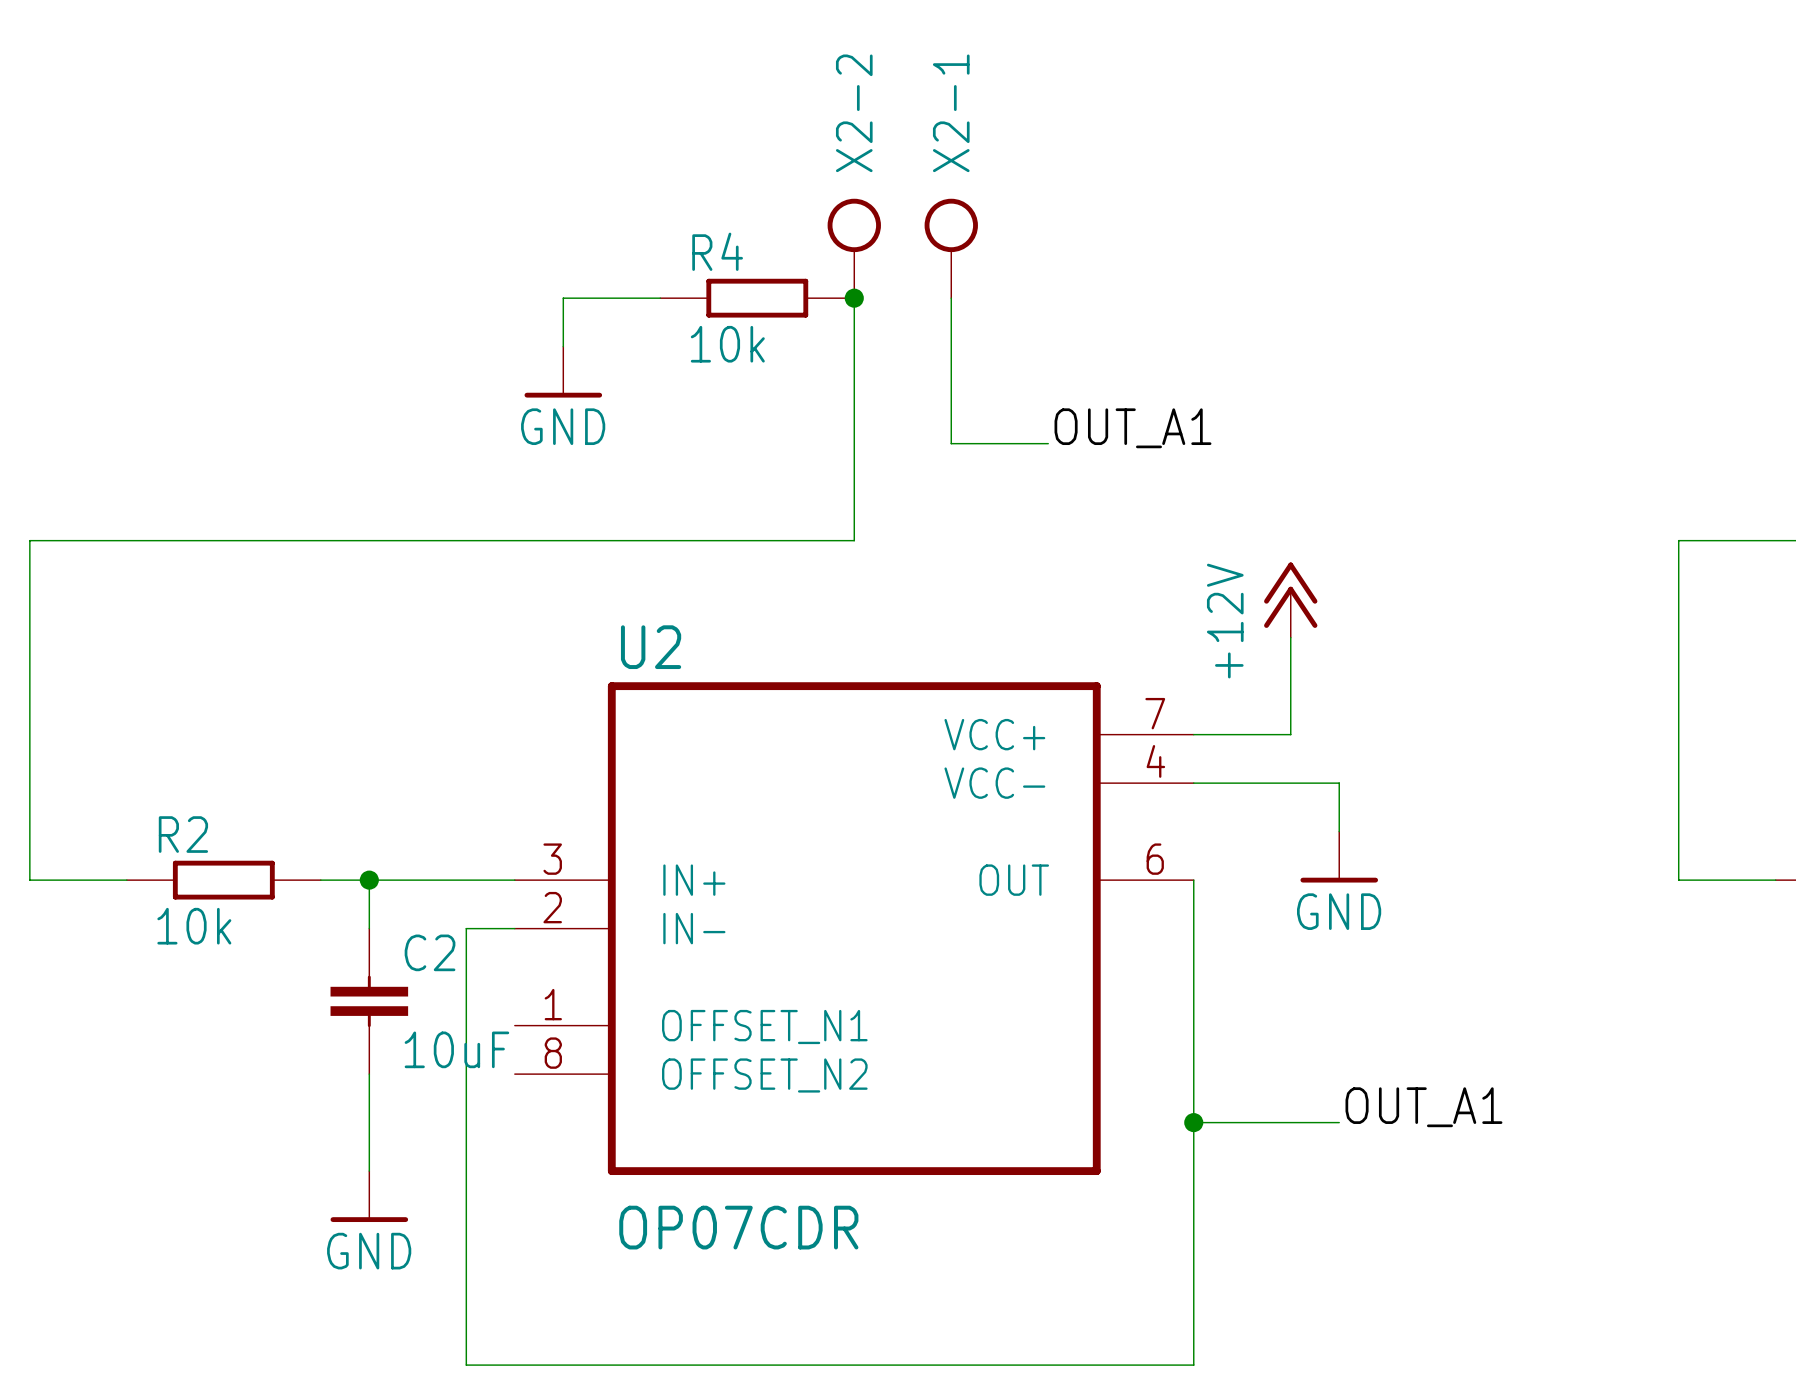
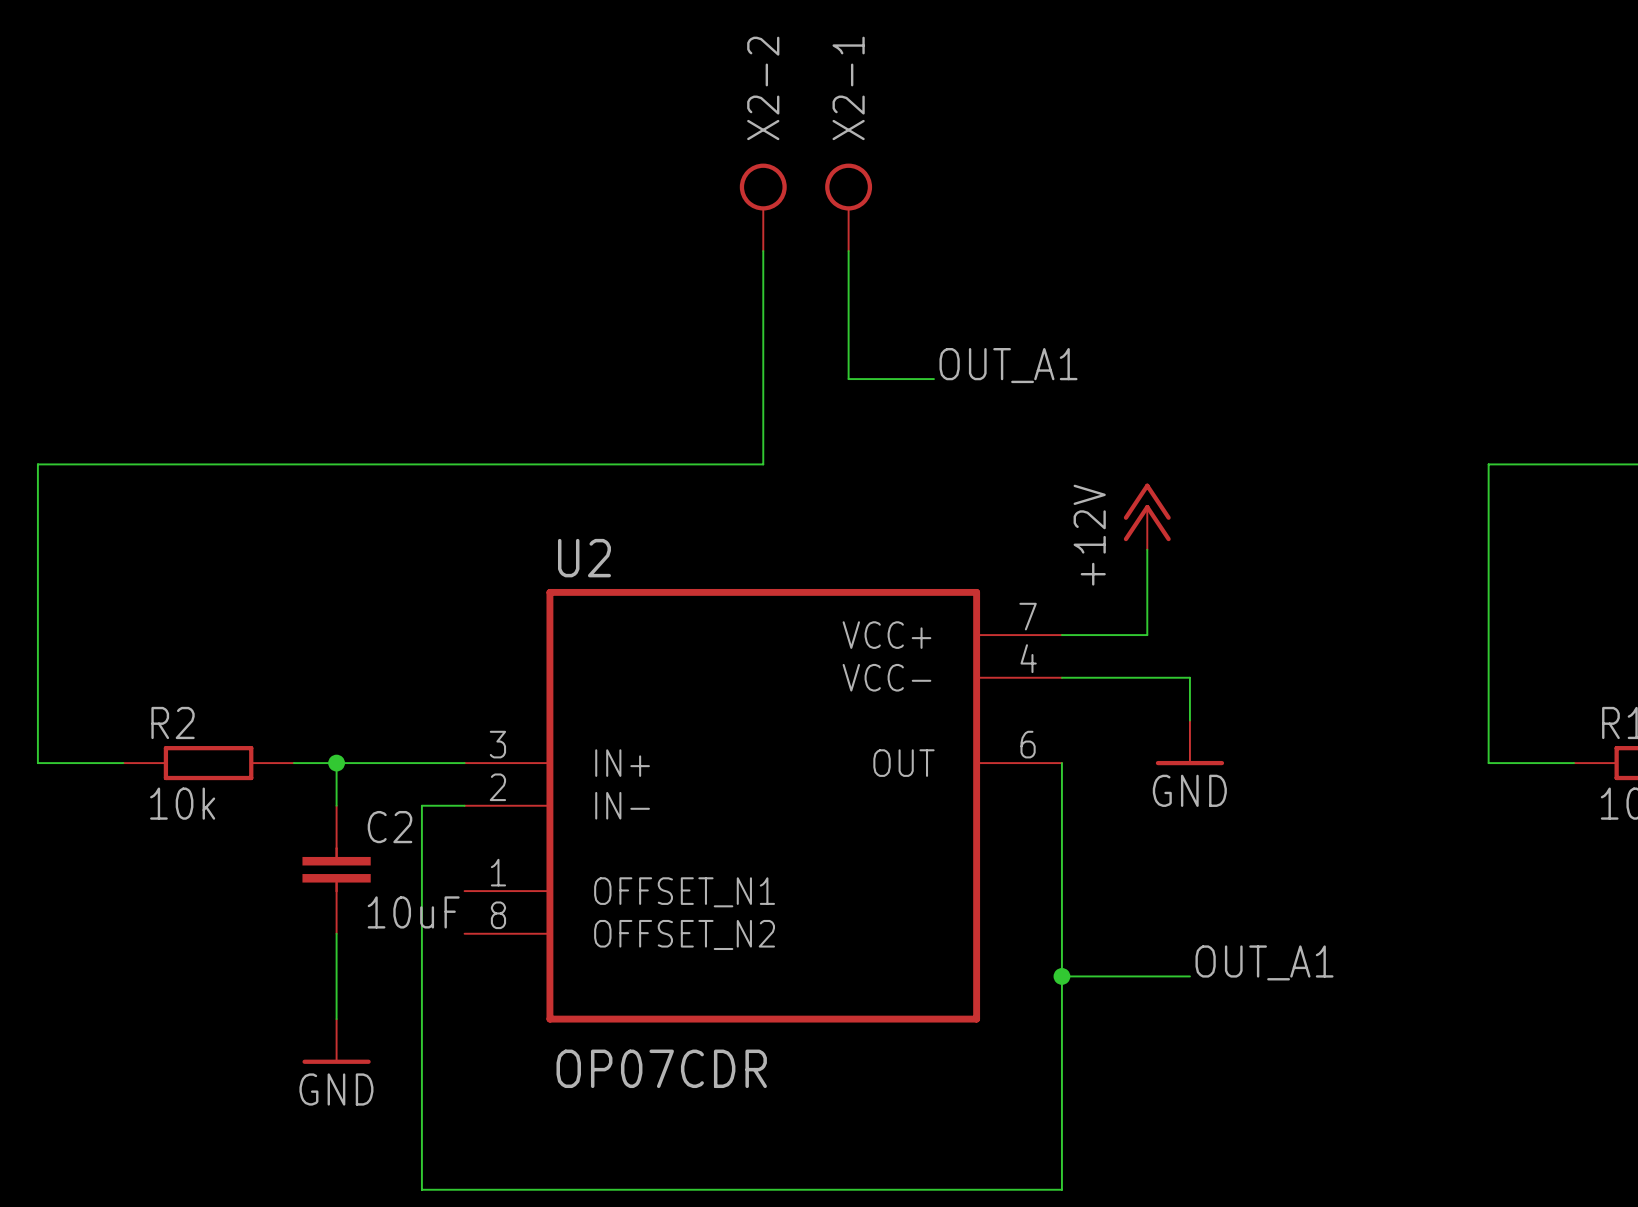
wire: (660, 298) (563, 298) (563, 346) -> none
R4: 10k (757, 298) -> none
junction: (854, 298) -> none
power symbol: GND (563, 372) -> none

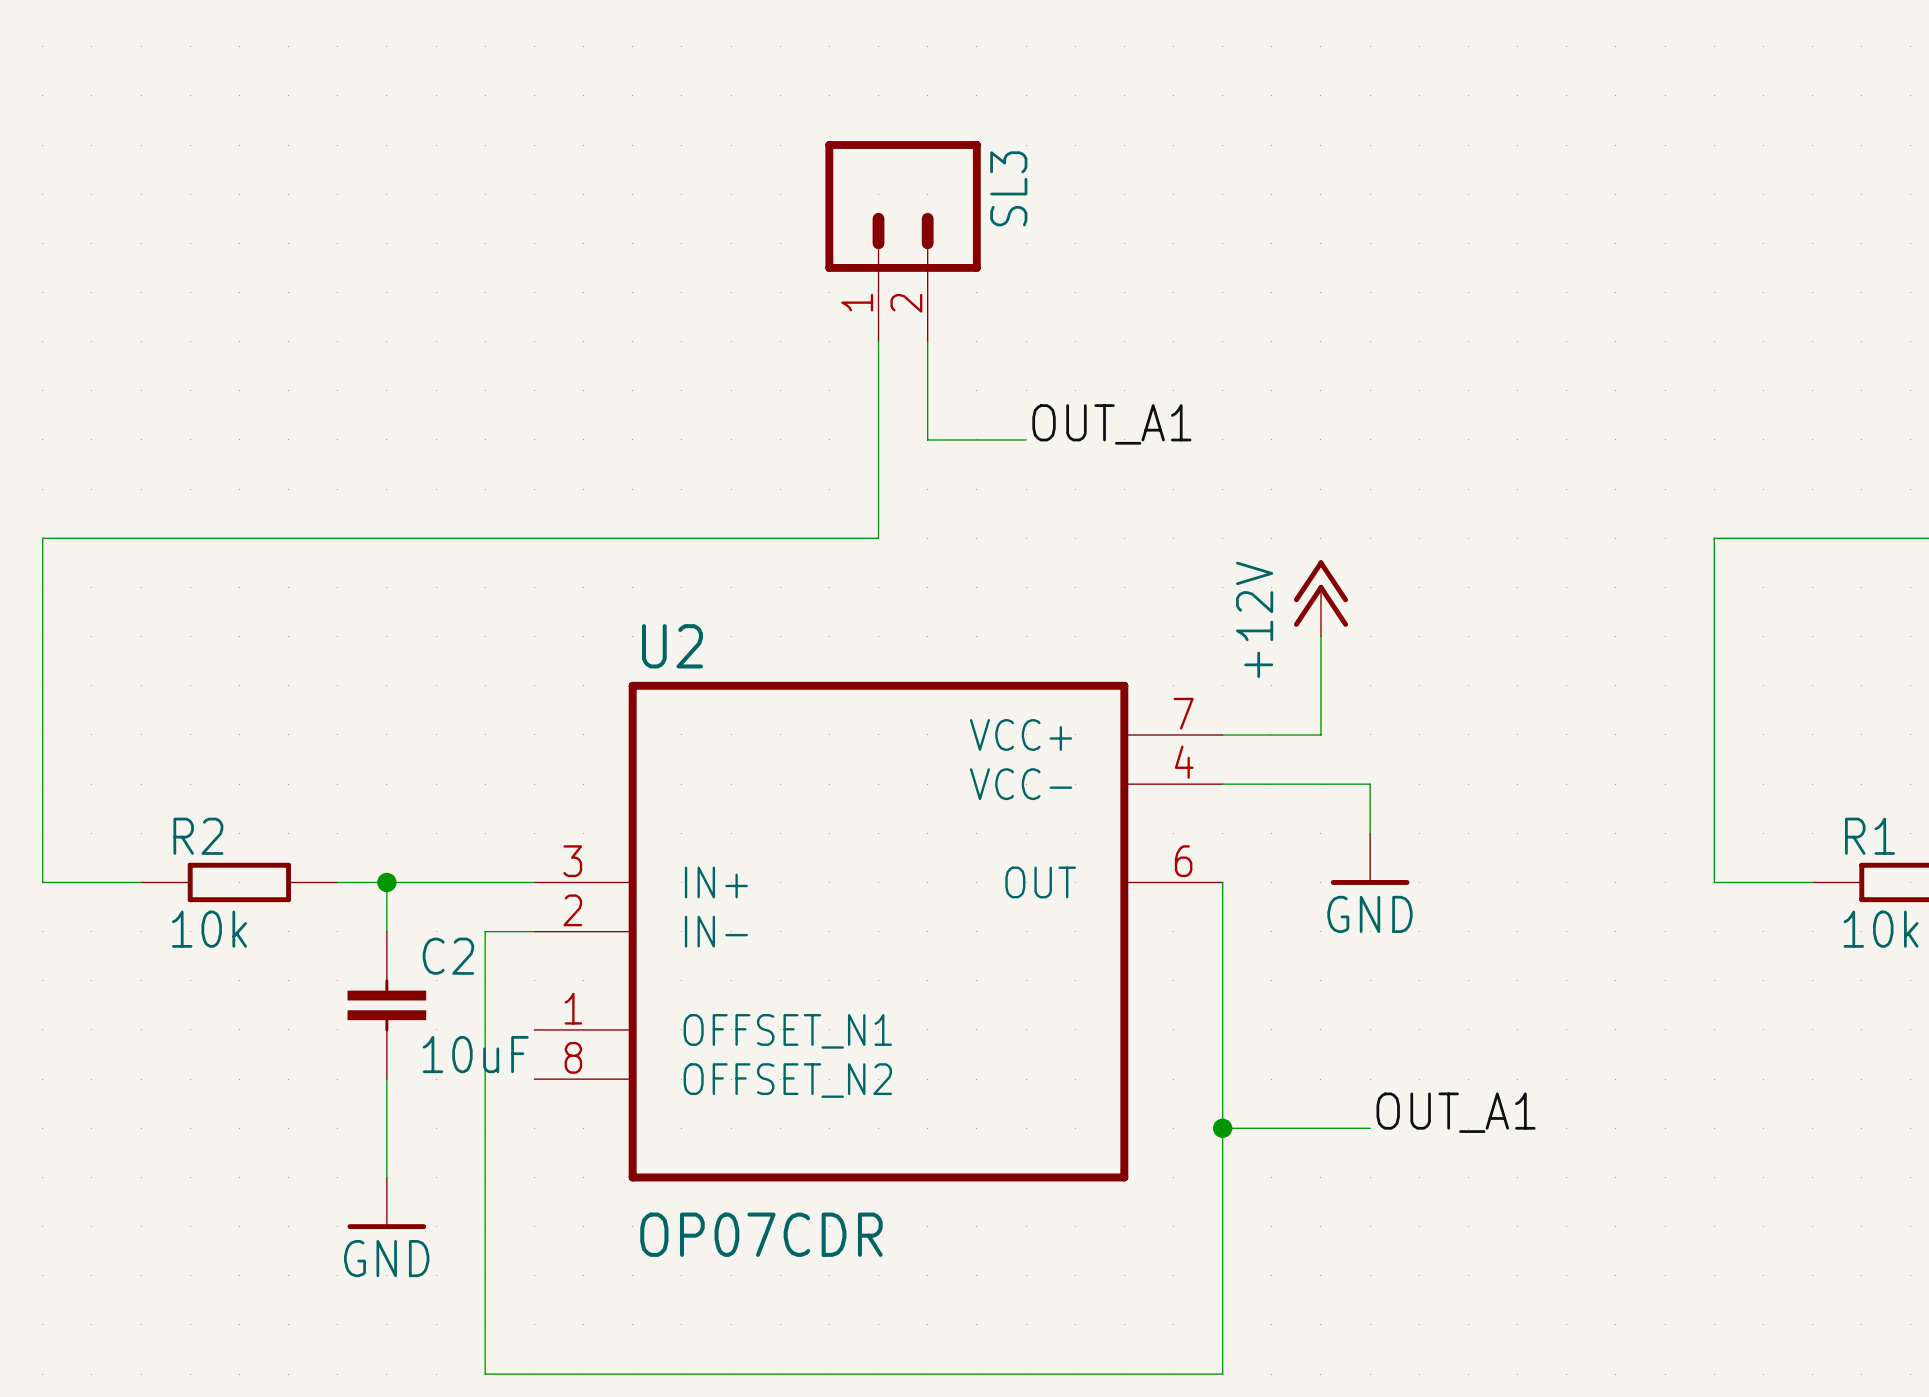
SL3: none -> (903, 241)
X2-2: (763, 207) -> none
X2-1: (848, 207) -> none
wire: (848, 251) (848, 379) -> (927, 341) (927, 439) (976, 439)
label position: OUT_A1 (1008, 365) -> OUT_A1 (1111, 424)
wire: (891, 379) (933, 379) -> none

